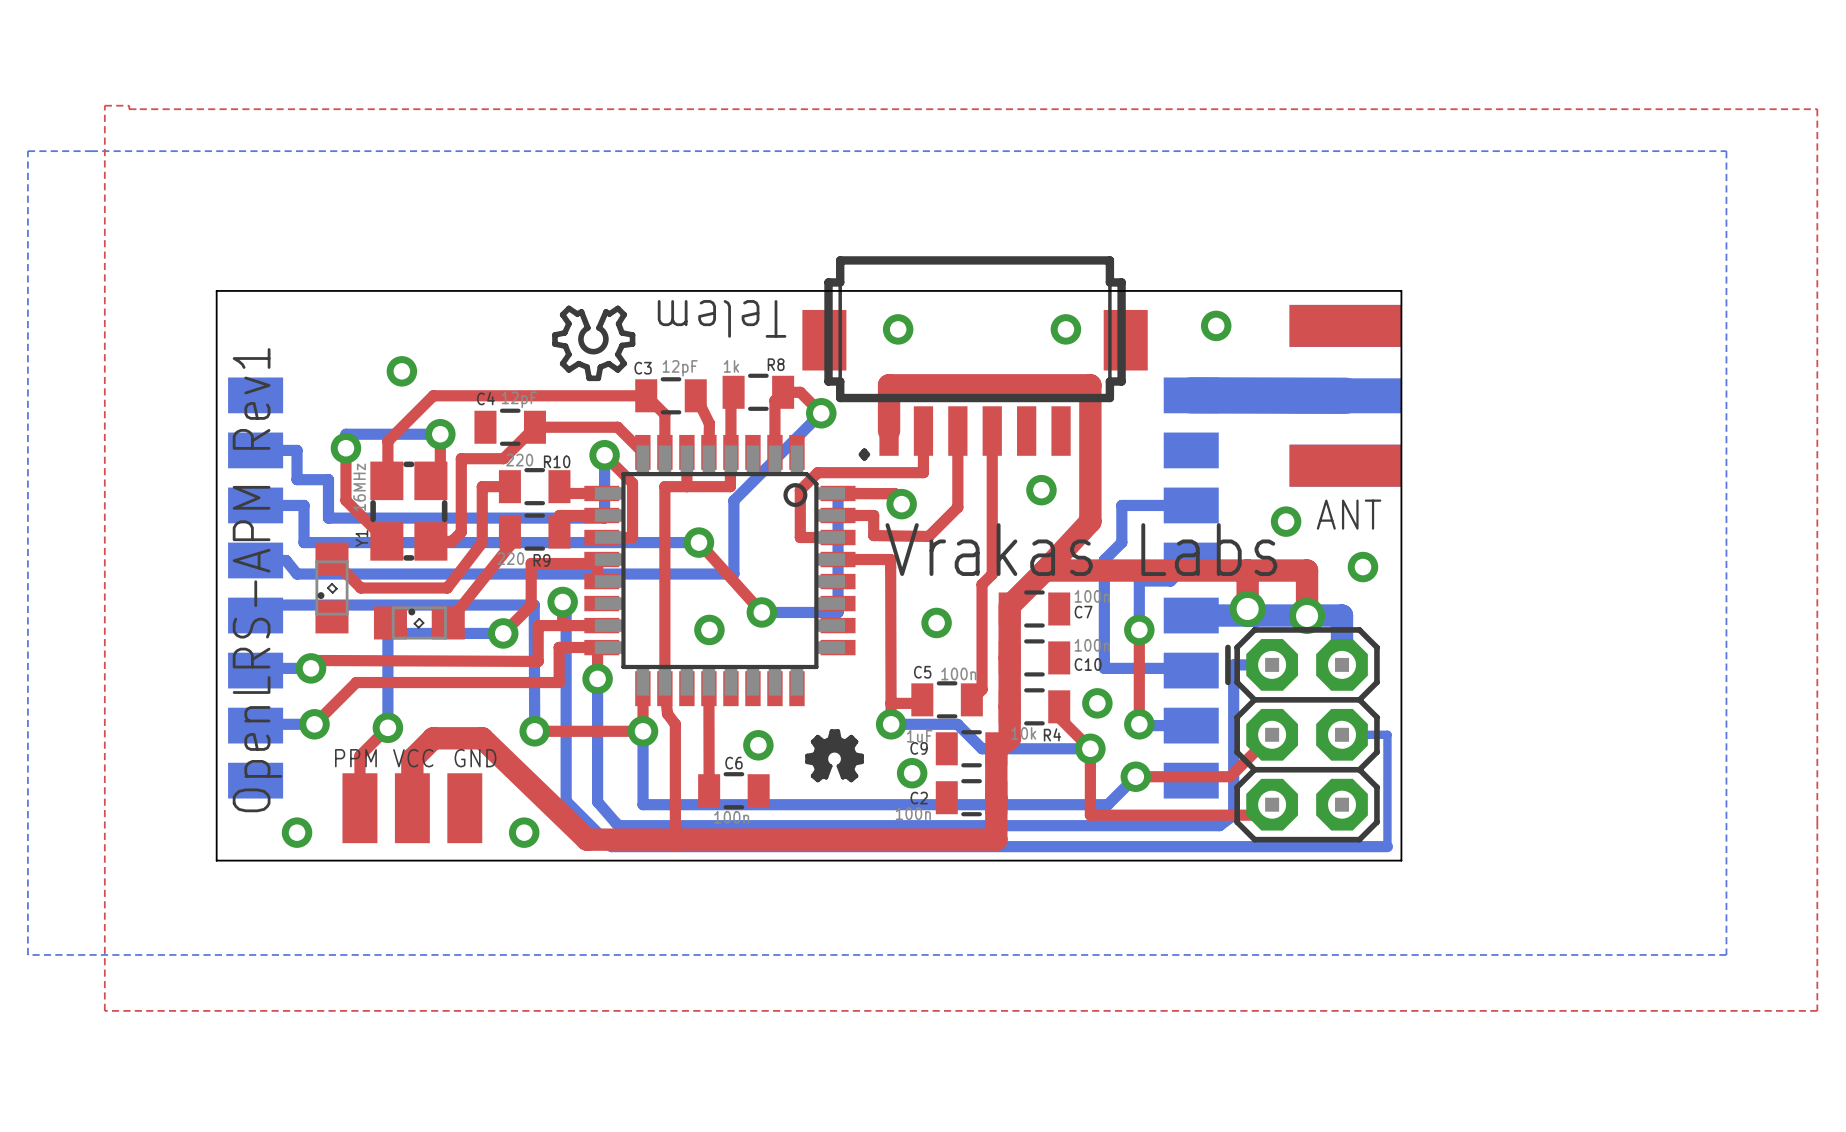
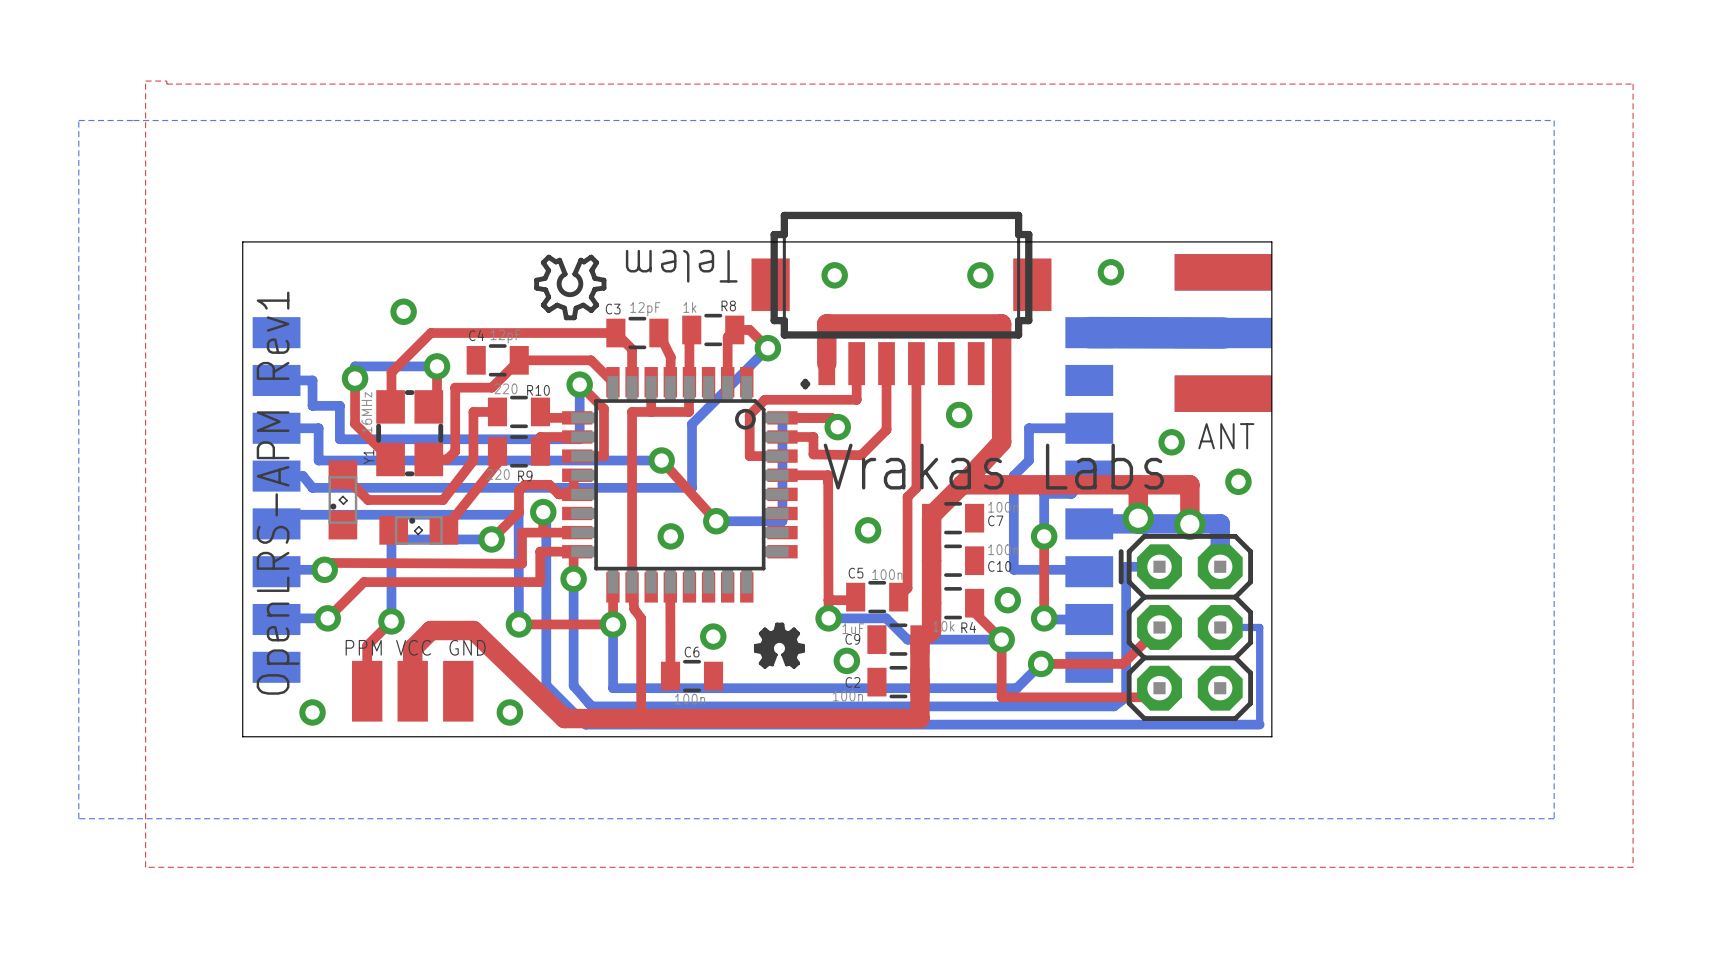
top track: (601, 559) (597, 563) (531, 563) (531, 605) -> (577, 494) (558, 494) (549, 484) (525, 484) (518, 490) (518, 512) (515, 515)

